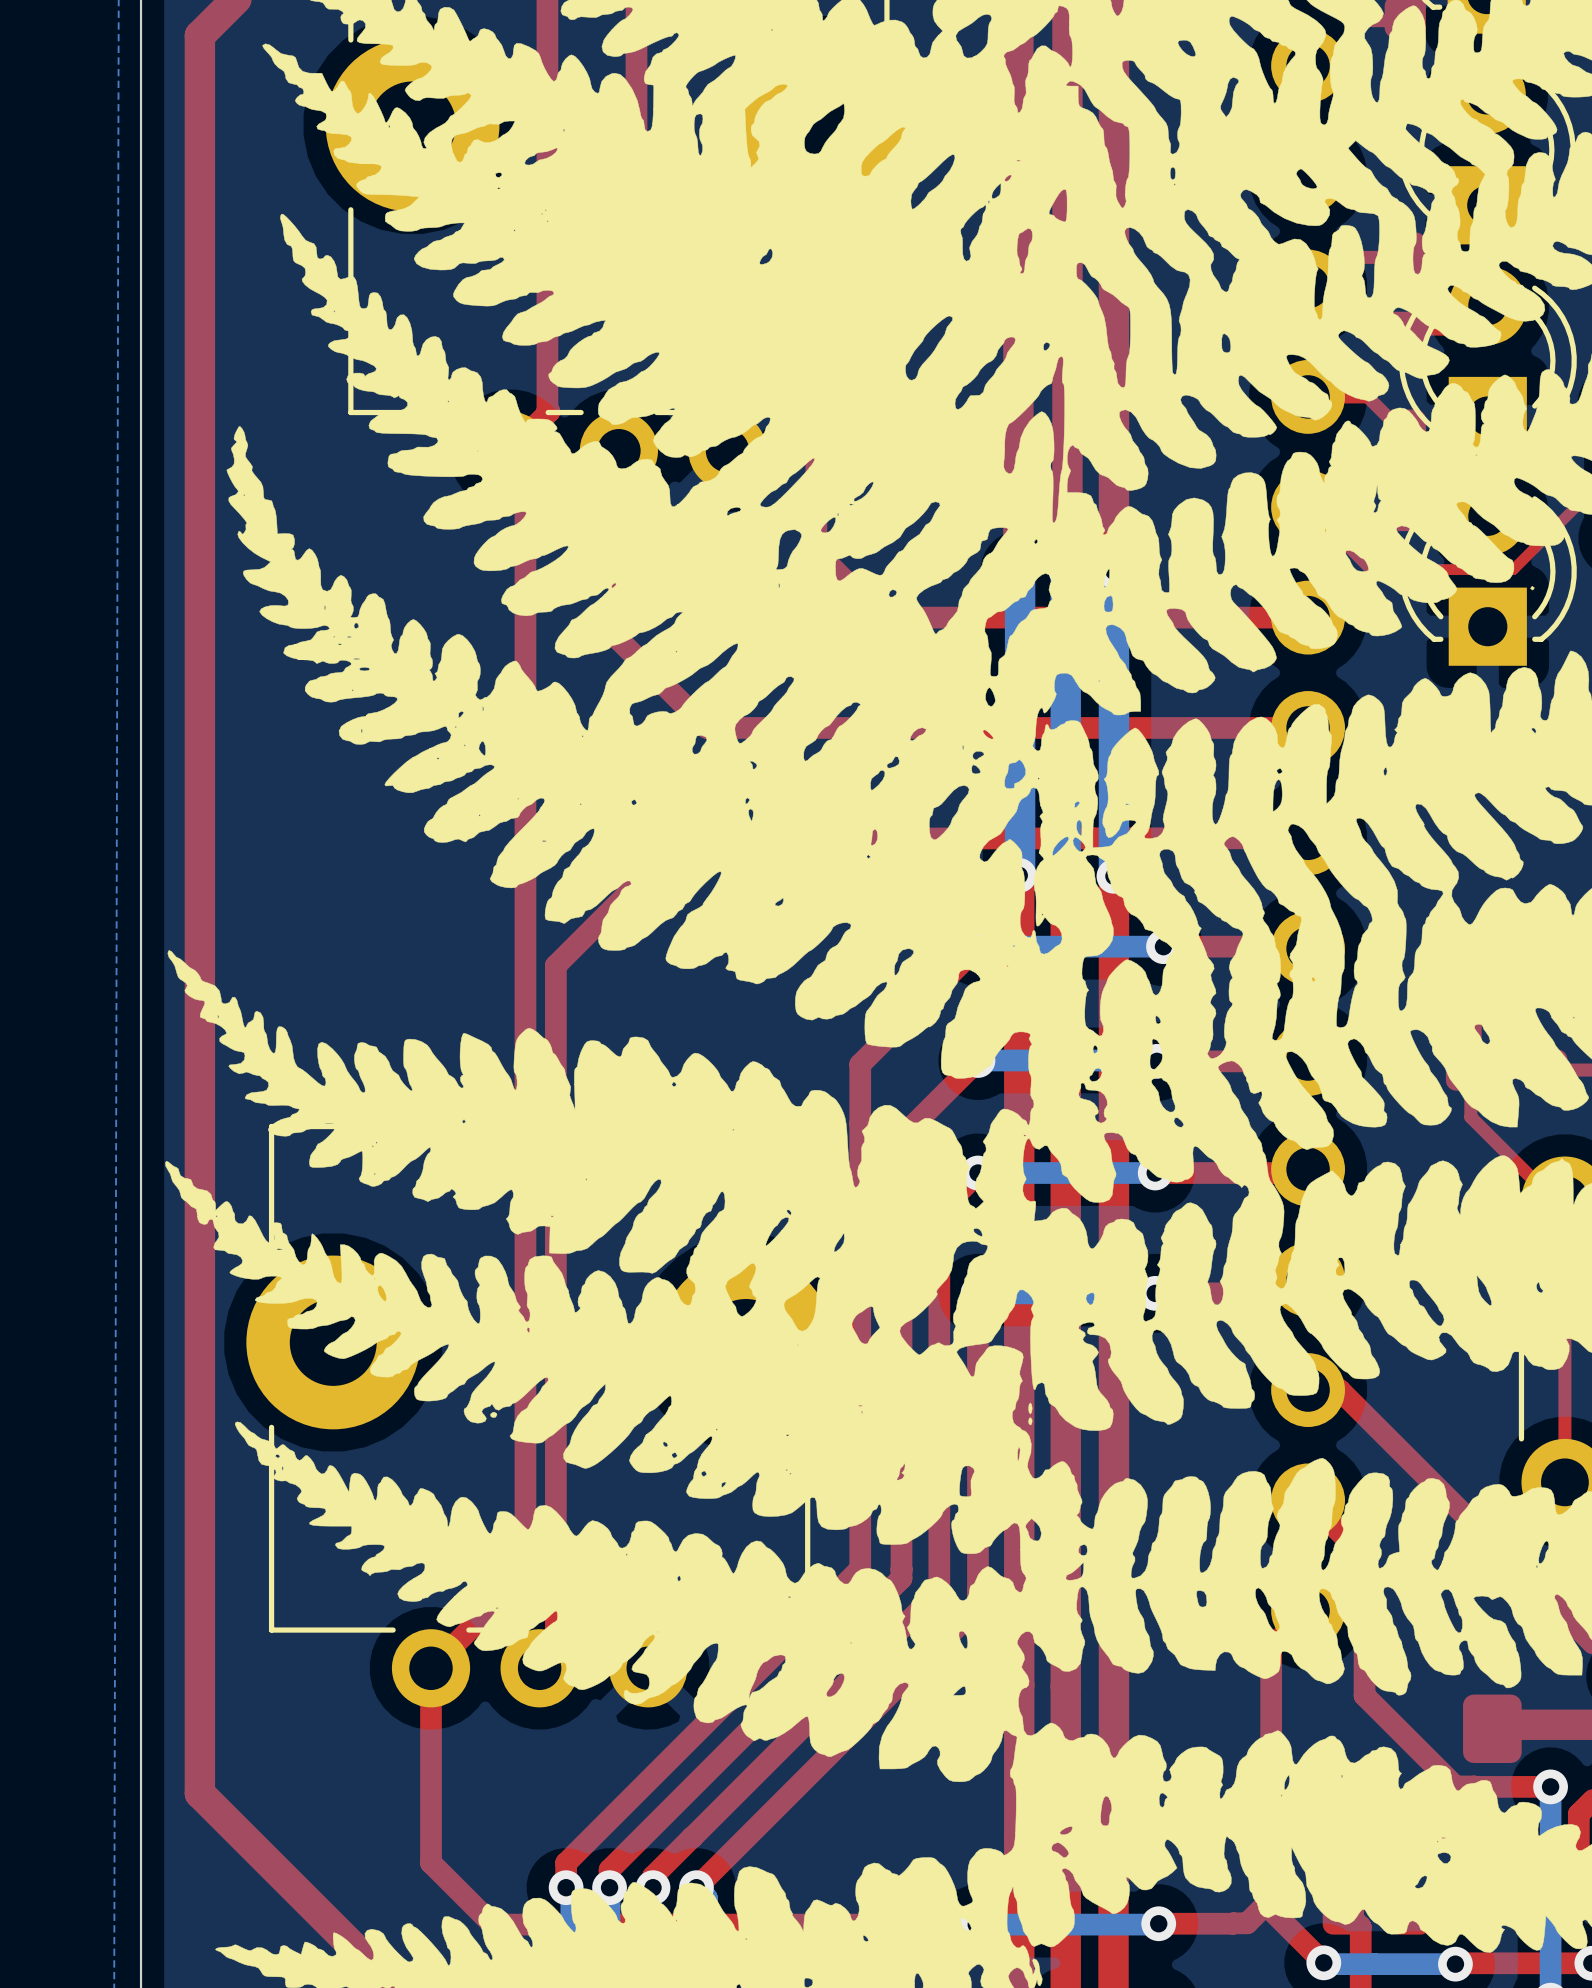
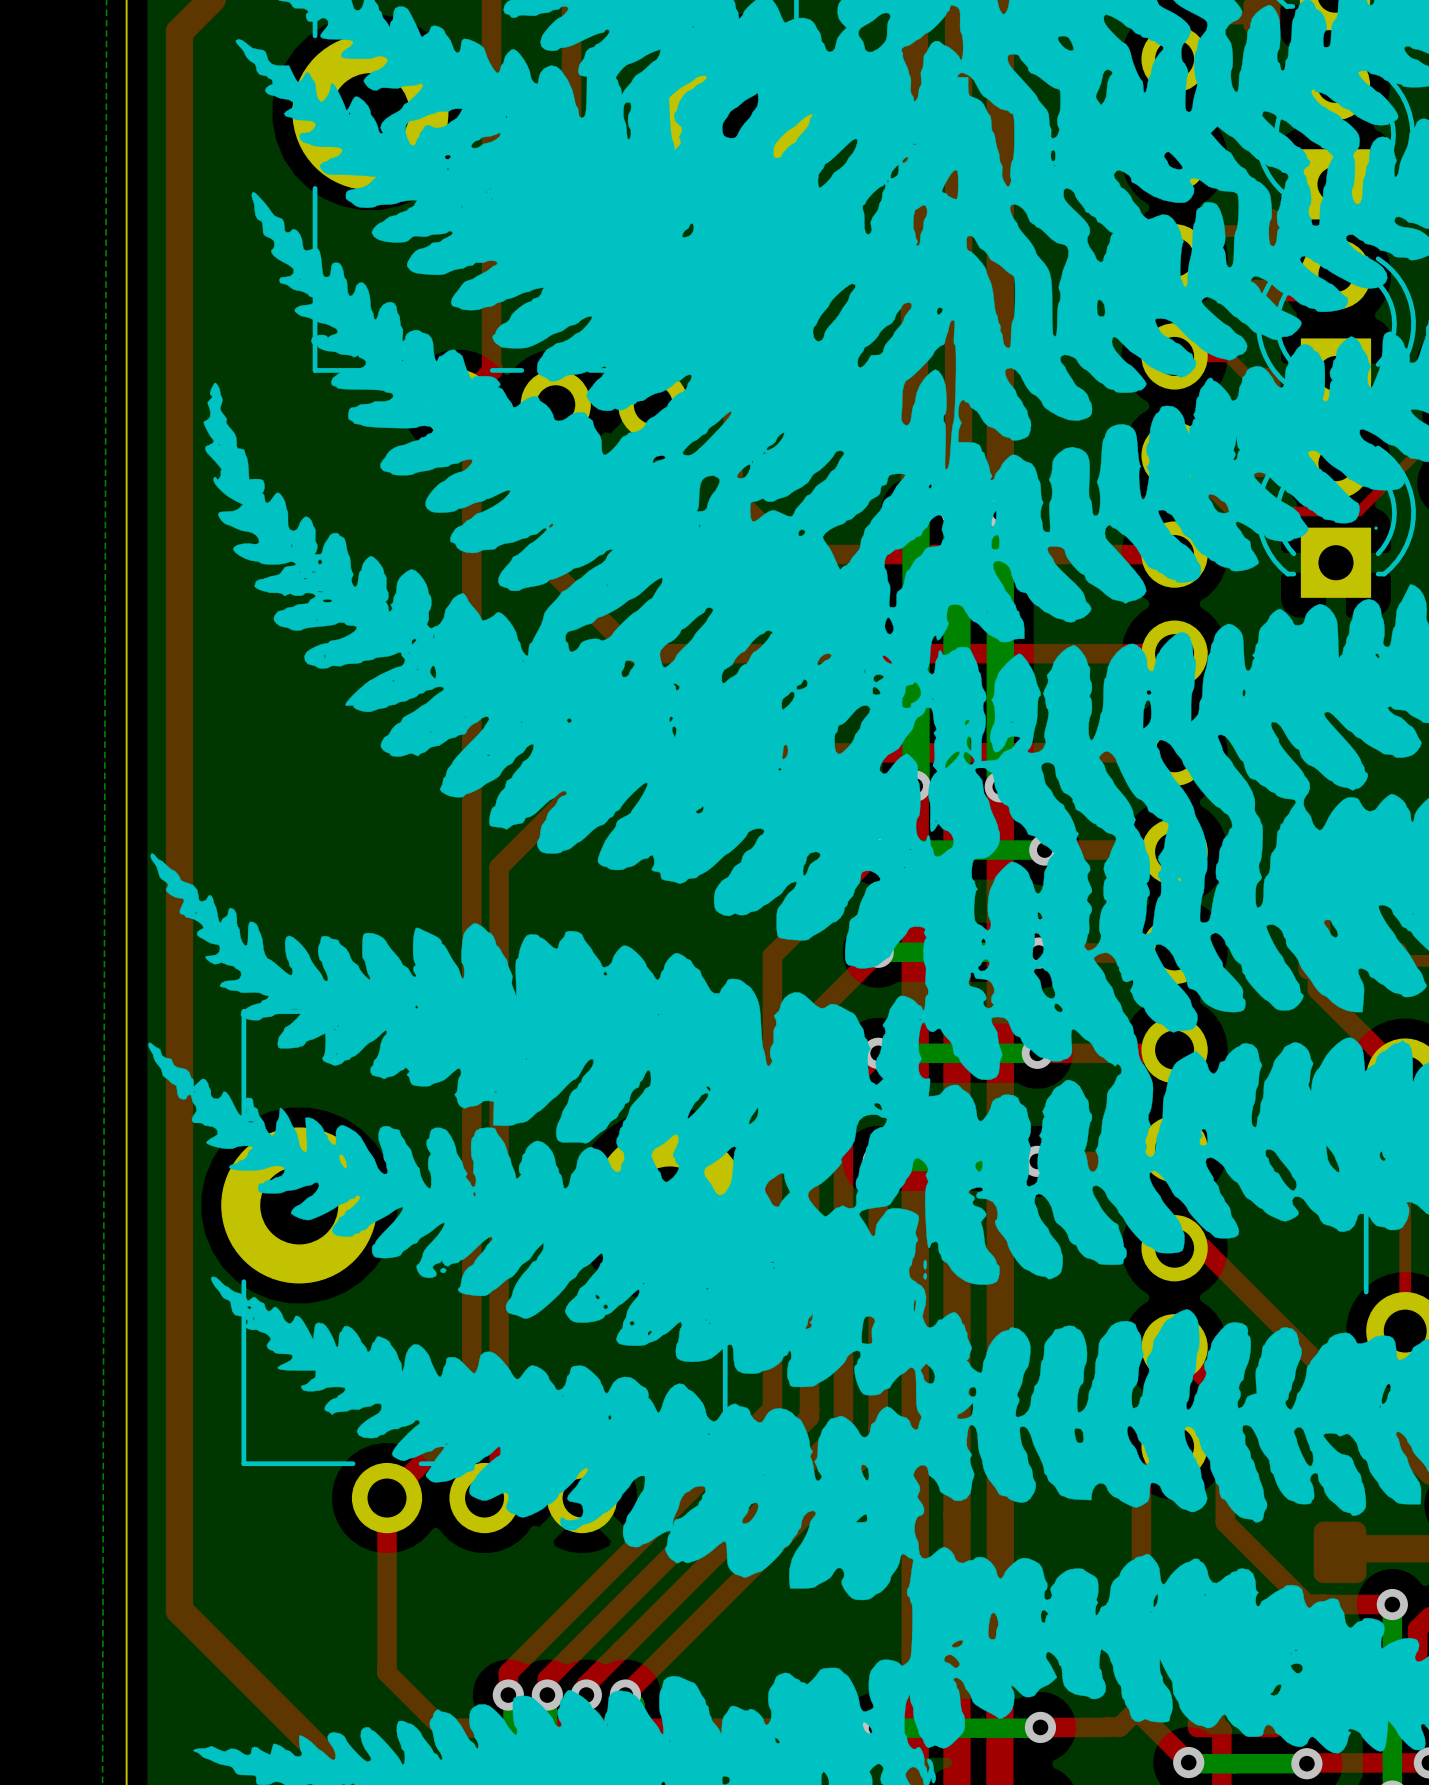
top track: none -> (1317, 960) (1317, 989) (1405, 1077)
top track: (1470, 1070) (1470, 1117) (1565, 1211) -> none

